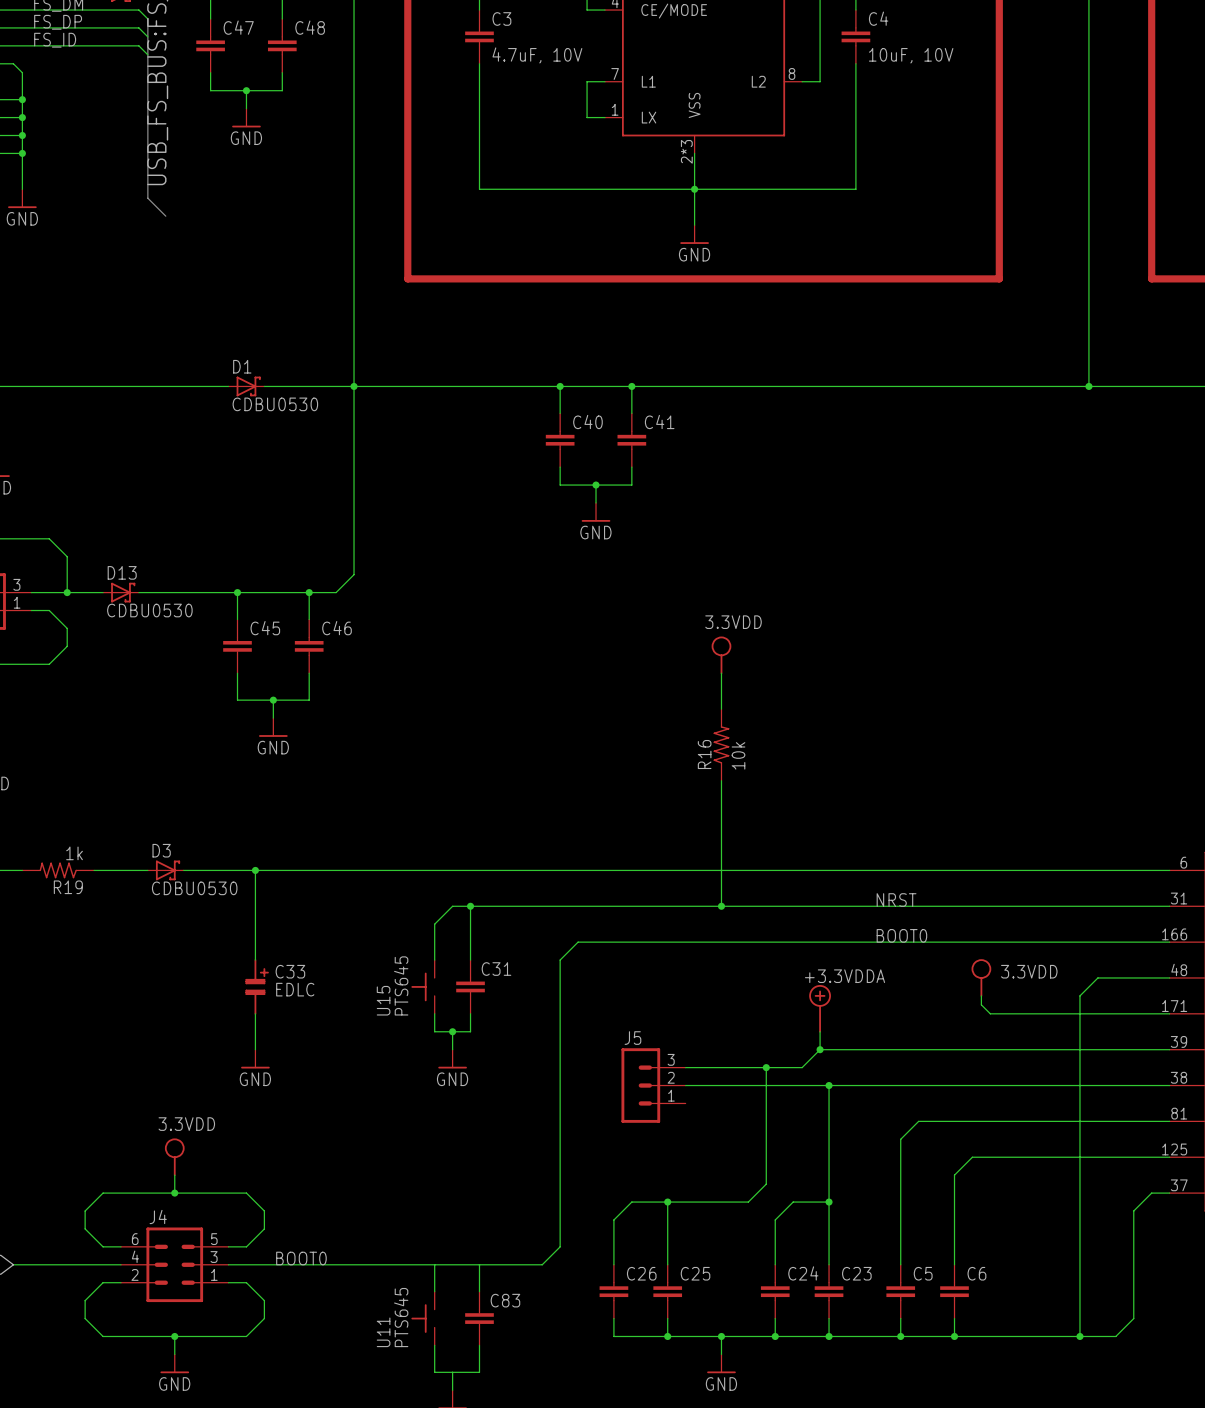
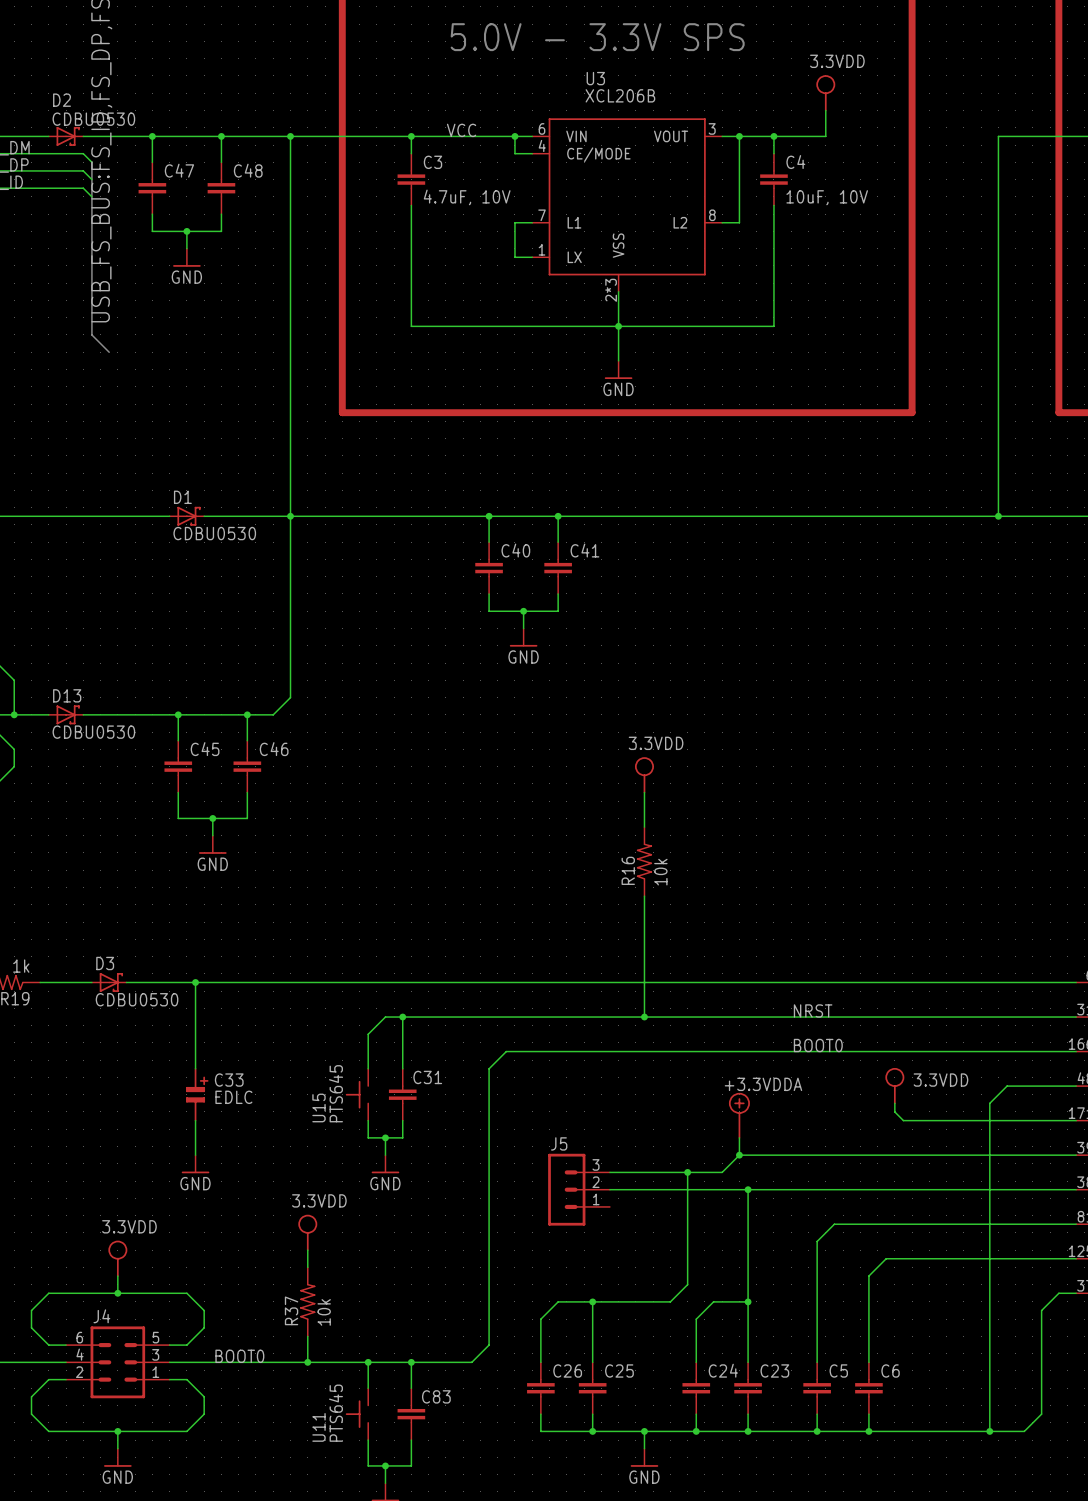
power symbol: none -> 3.3VDD (307, 1232)
wire: none -> (307, 1250) (307, 1267)
R37: none -> 10k (307, 1301)
wire: none -> (307, 1336) (307, 1362)
junction: none -> (307, 1362)
junction: none -> (368, 1362)
junction: none -> (411, 1362)
junction: none -> (385, 1465)

